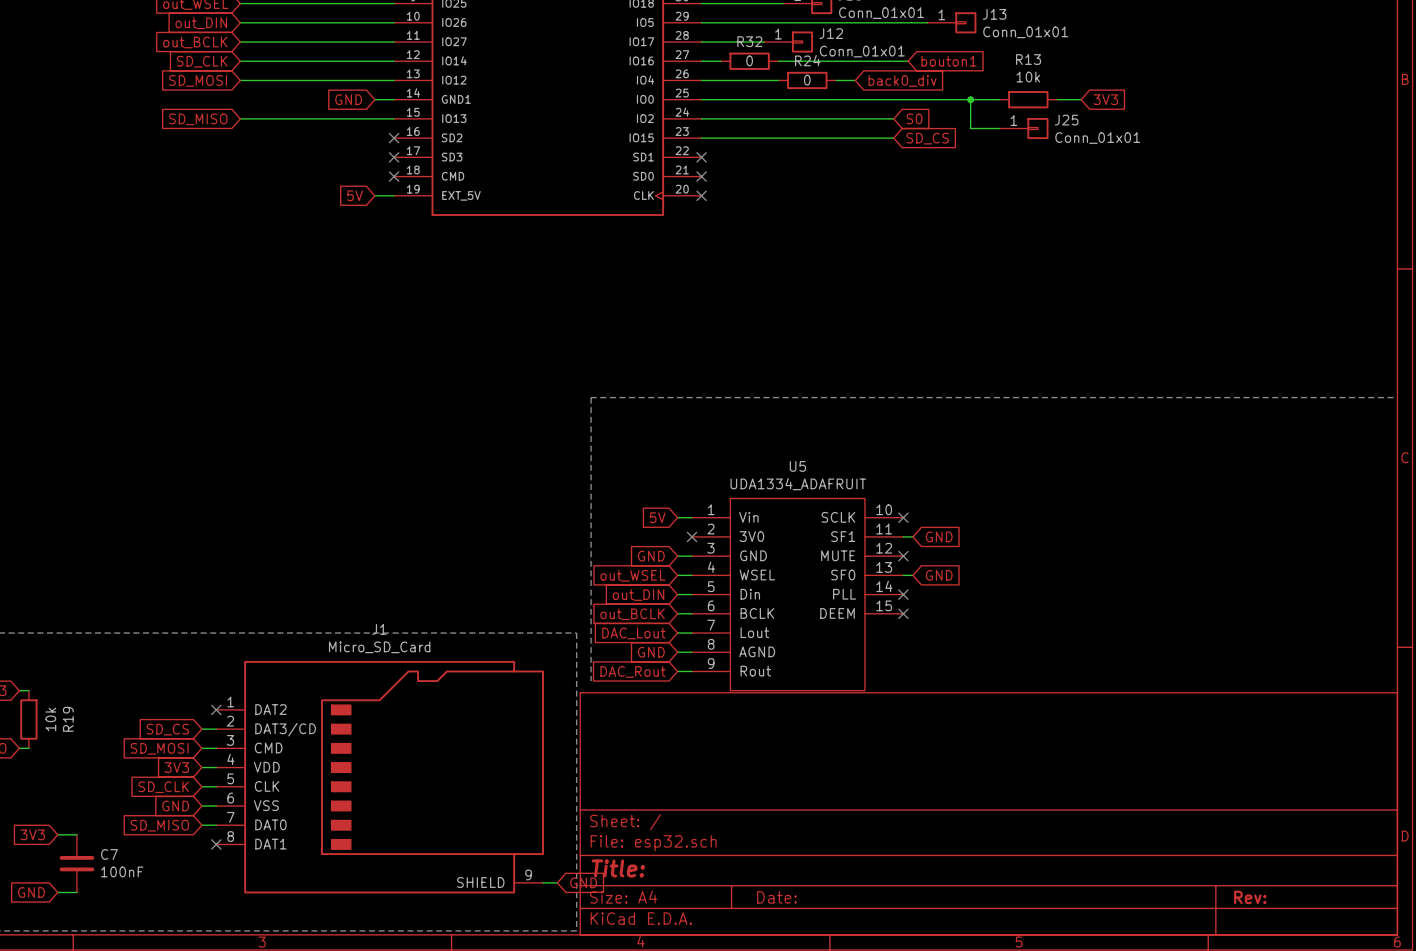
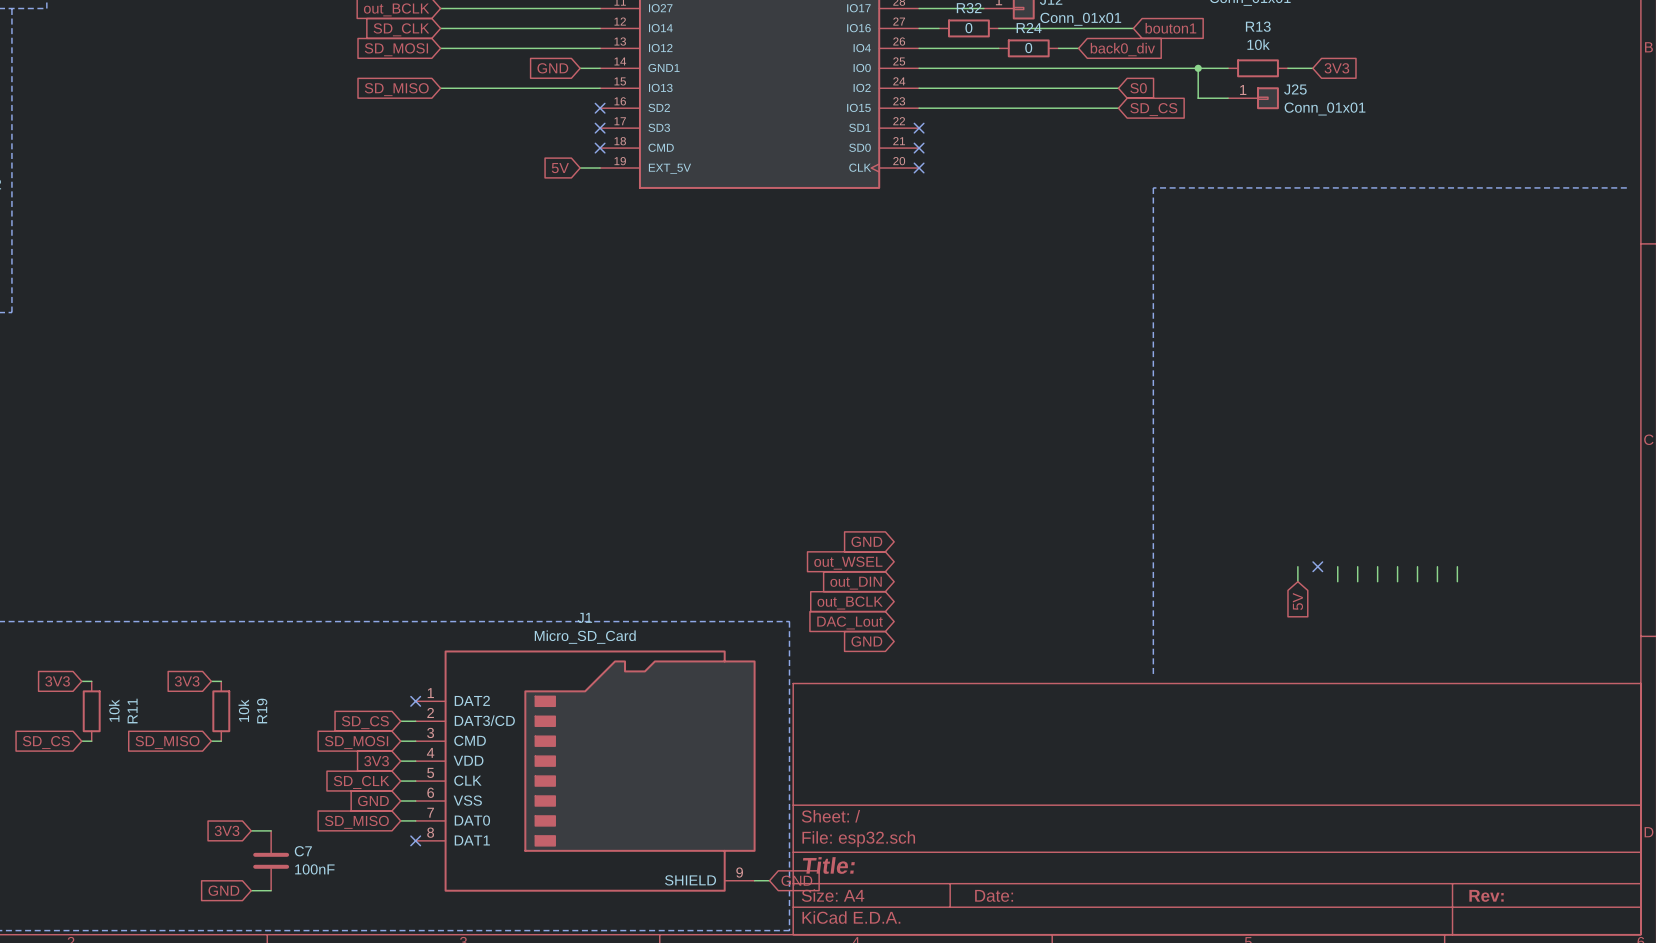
line: none -> (1626, 187) (1153, 187) (1153, 676)
line: (1393, 397) (591, 397) (591, 681) -> none
global label: 5V (657, 517) -> none
wire: (677, 517) (691, 517) -> none
no-connect mark: (903, 517) -> none
no-connect mark: (691, 536) -> none
wire: (903, 536) (912, 536) -> none
global label: GND (939, 536) -> none
wire: (677, 556) (691, 556) -> none
no-connect mark: (903, 556) -> none
wire: (677, 575) (691, 575) -> none
wire: (903, 575) (912, 575) -> none
global label: GND (939, 575) -> none
wire: none -> (1297, 566) (1297, 581)
no-connect mark: none -> (1317, 566)
wire: none -> (1337, 566) (1337, 581)
wire: none -> (1357, 566) (1357, 581)
wire: none -> (1377, 566) (1377, 581)
wire: none -> (1397, 566) (1397, 581)
wire: none -> (1417, 566) (1417, 581)
wire: none -> (1437, 566) (1437, 581)
wire: none -> (1457, 566) (1457, 581)
wire: (677, 594) (691, 594) -> none
U5: UDA1334_ADAFRUIT (797, 594) -> none
no-connect mark: (903, 594) -> none
wire: (677, 613) (691, 613) -> none
no-connect mark: (903, 613) -> none
global label: none -> 5V (1297, 601)
wire: (677, 633) (691, 633) -> none
wire: (677, 652) (691, 652) -> none
global label: DAC_Rout (633, 671) -> none
wire: (677, 671) (691, 671) -> none

